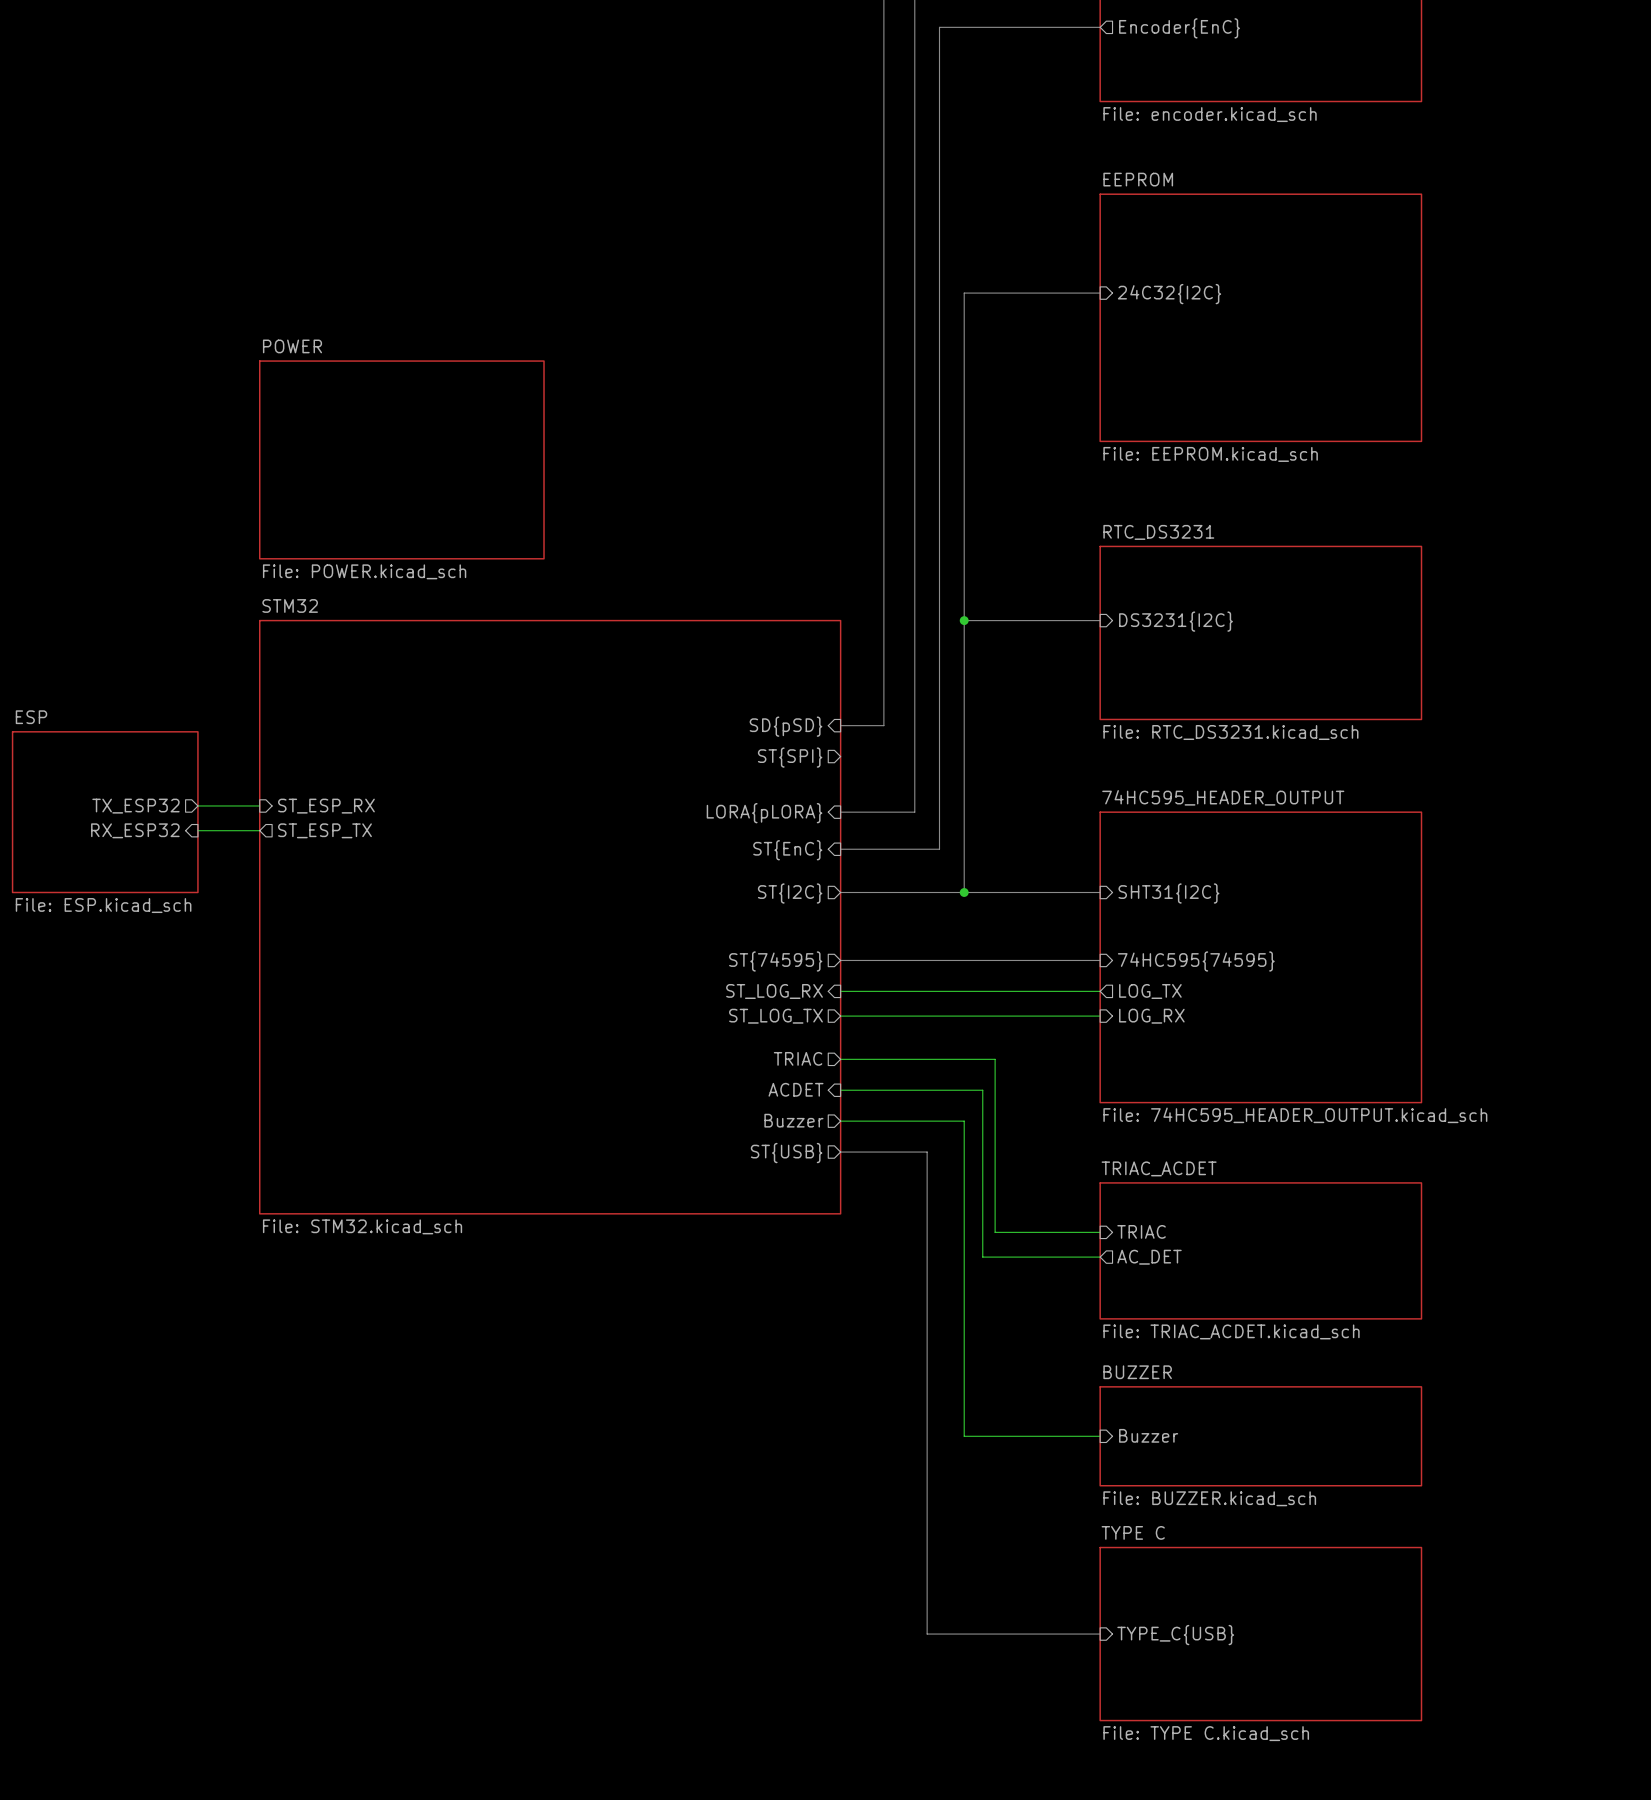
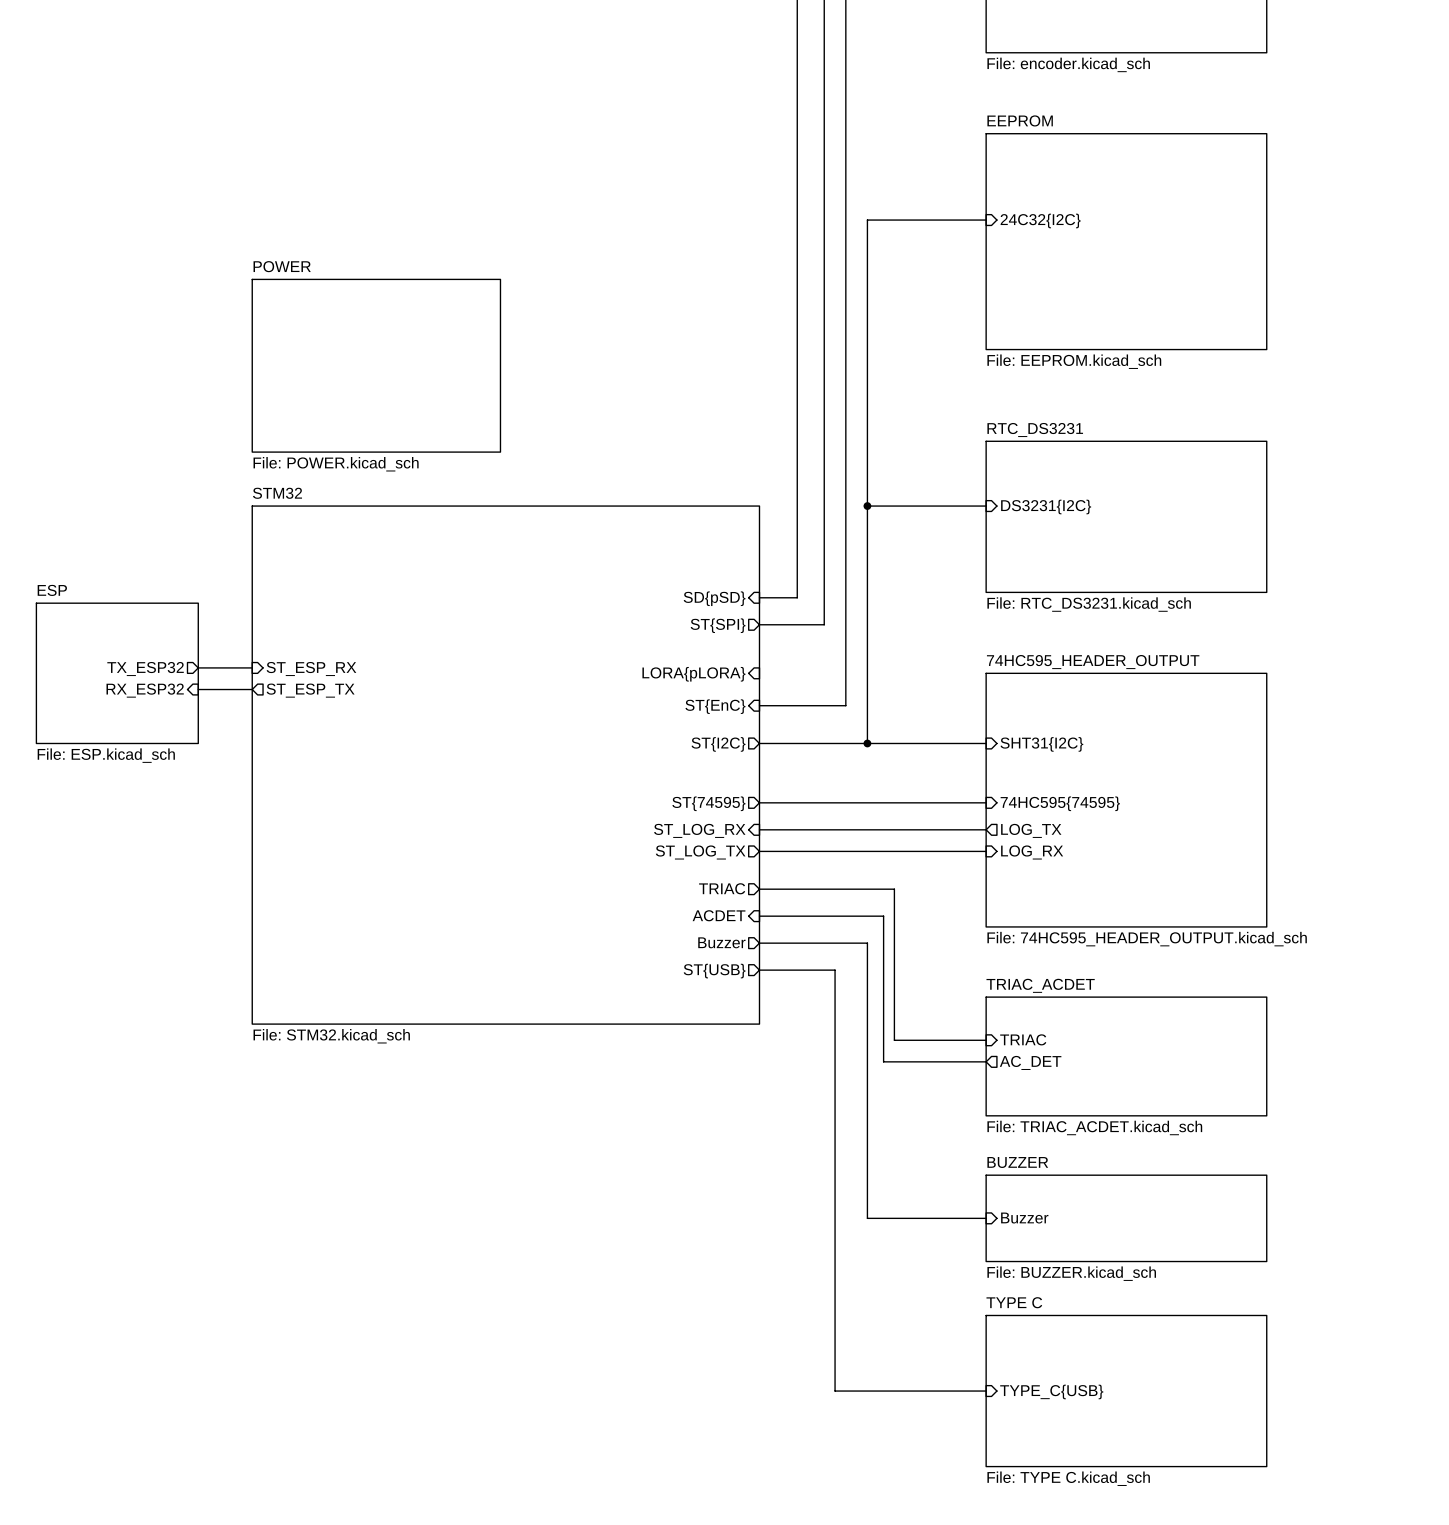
bus: (914, 756) (914, 812) (840, 812) -> (824, 624) (759, 624)

